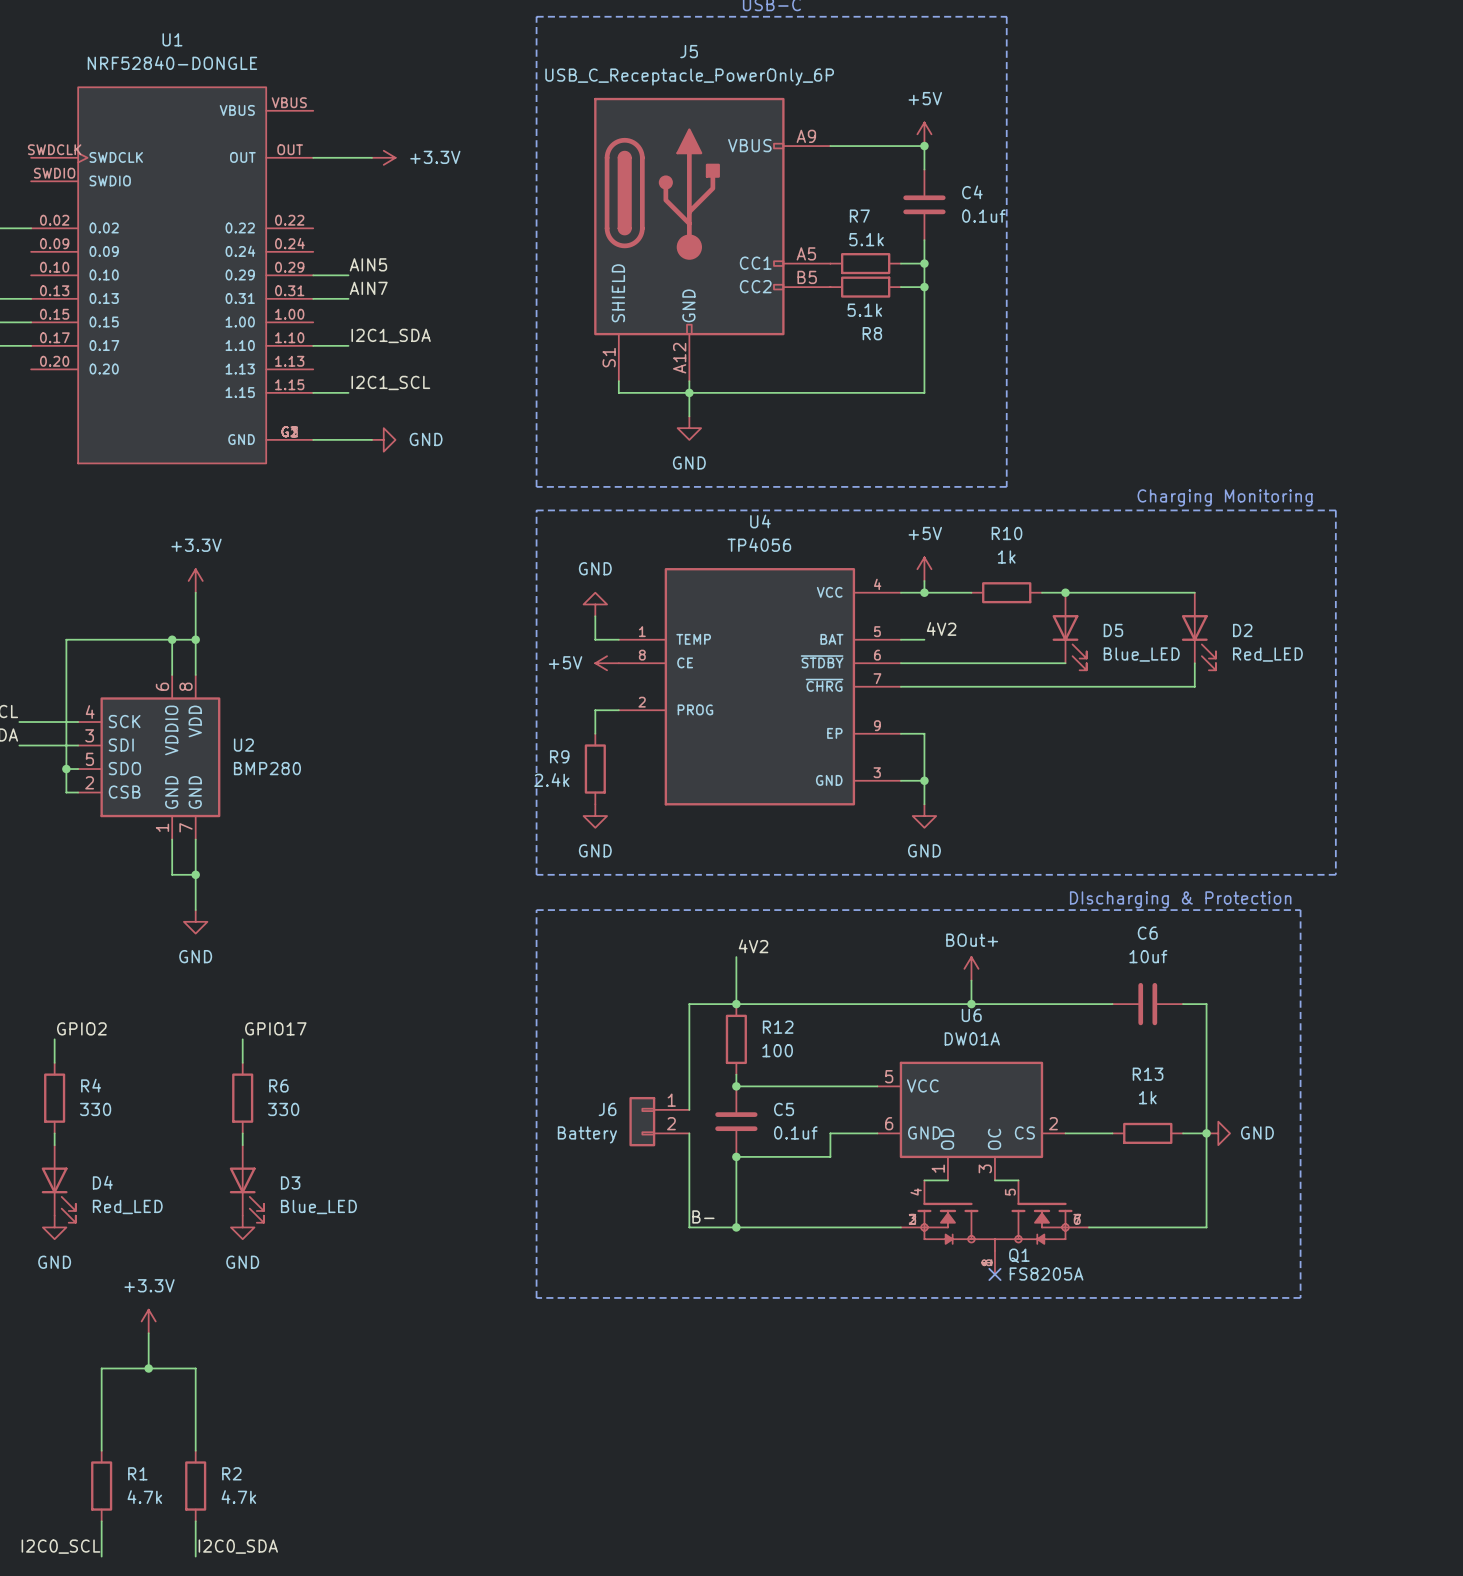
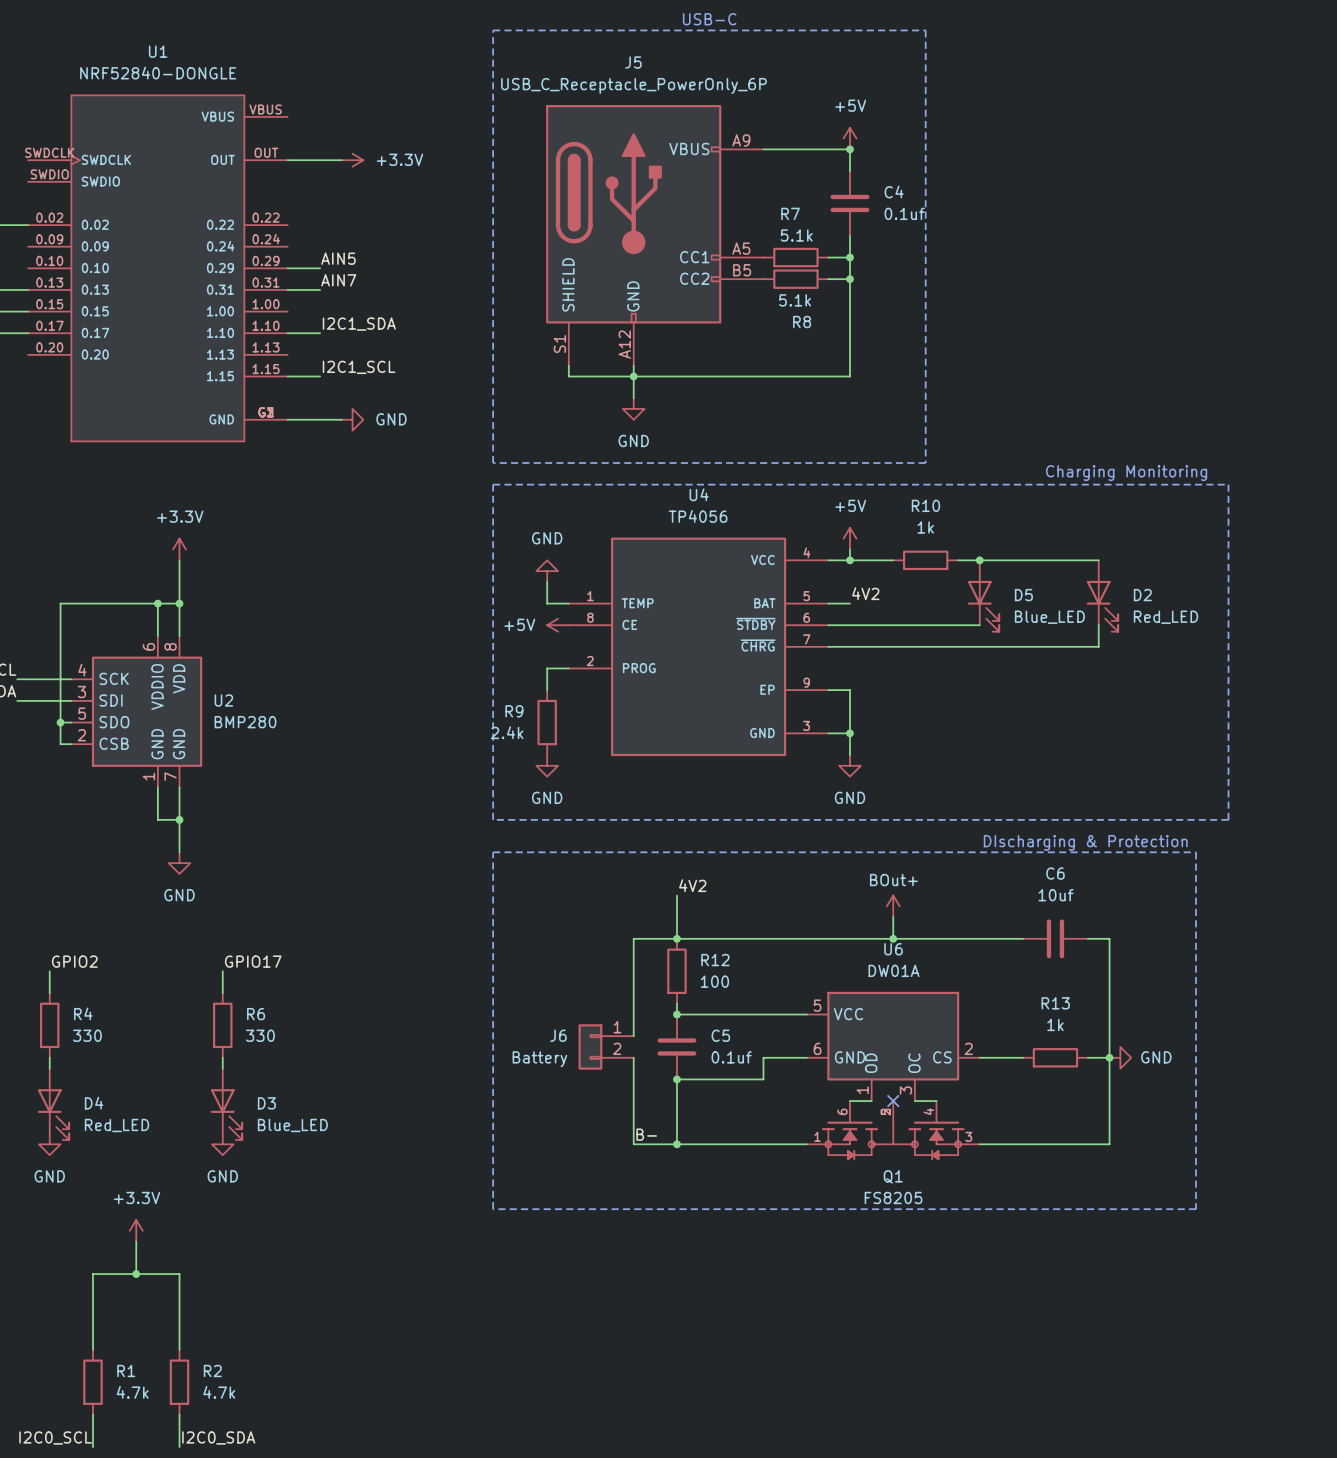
Q1 symbol: [900, 1180, 1090, 1275] -> [806, 1101, 980, 1161]
no-connect mark: none -> (893, 1101)
Q1 name position: Q1 (1019, 1255) -> Q1 (893, 1176)
no-connect mark: (994, 1274) -> none
Q1 value: FS8205A (1046, 1274) -> FS8205 (893, 1197)

